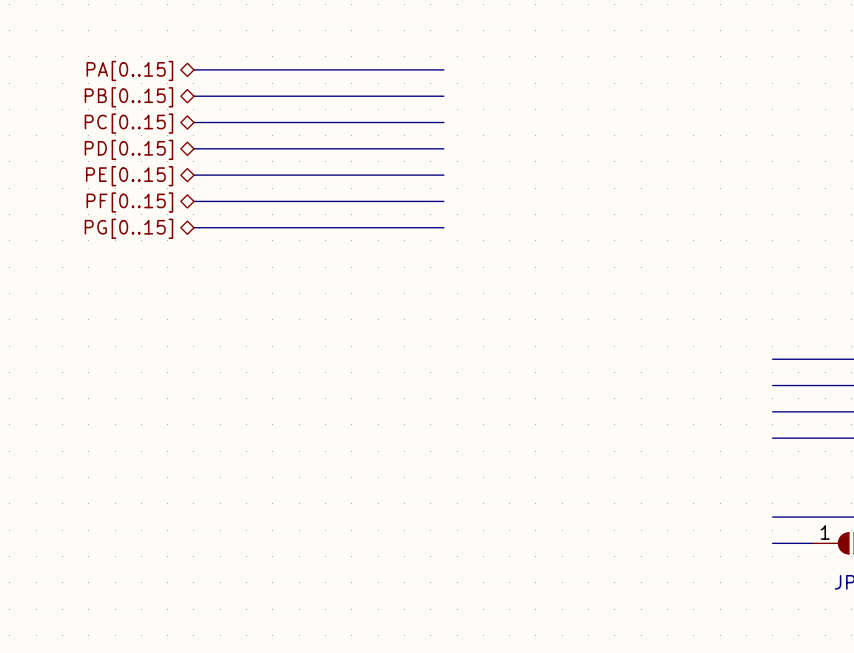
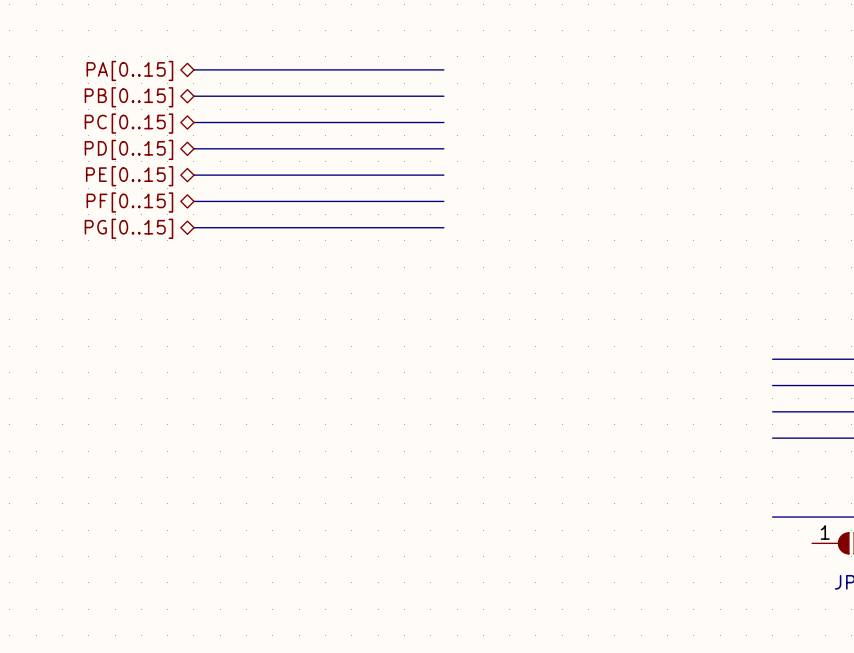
wire: (772, 543) (812, 543) -> none

